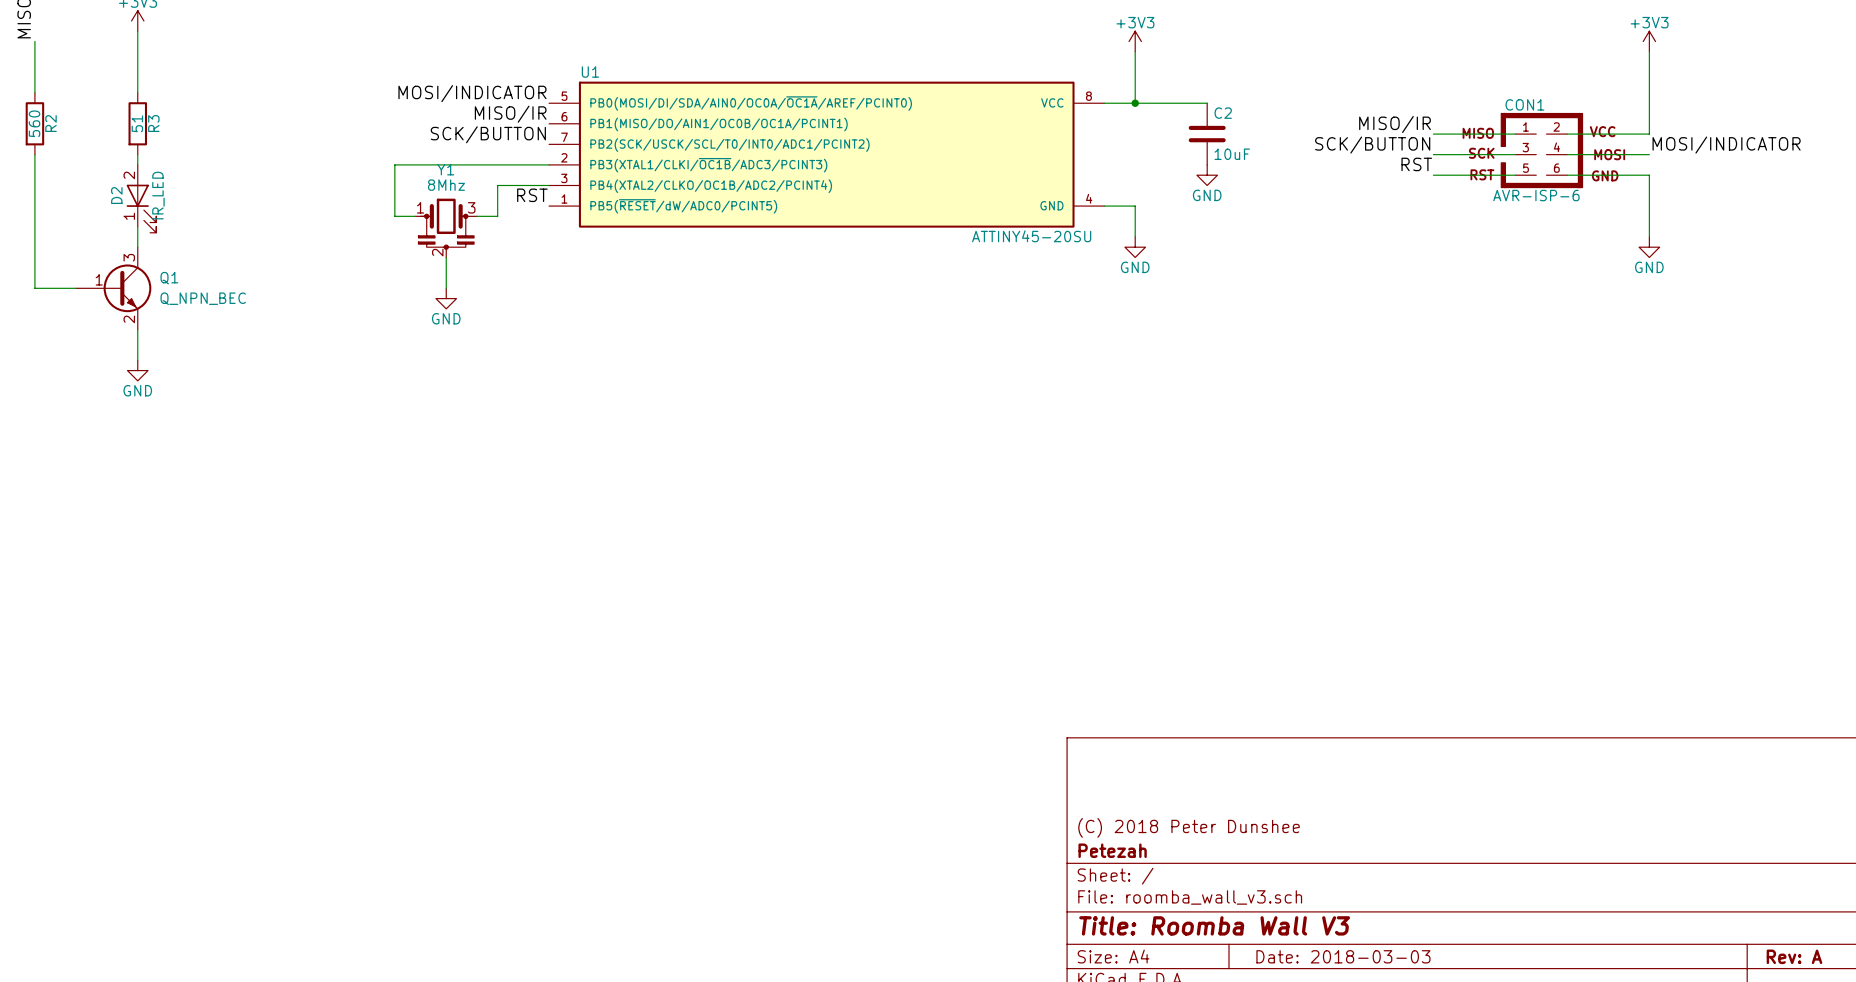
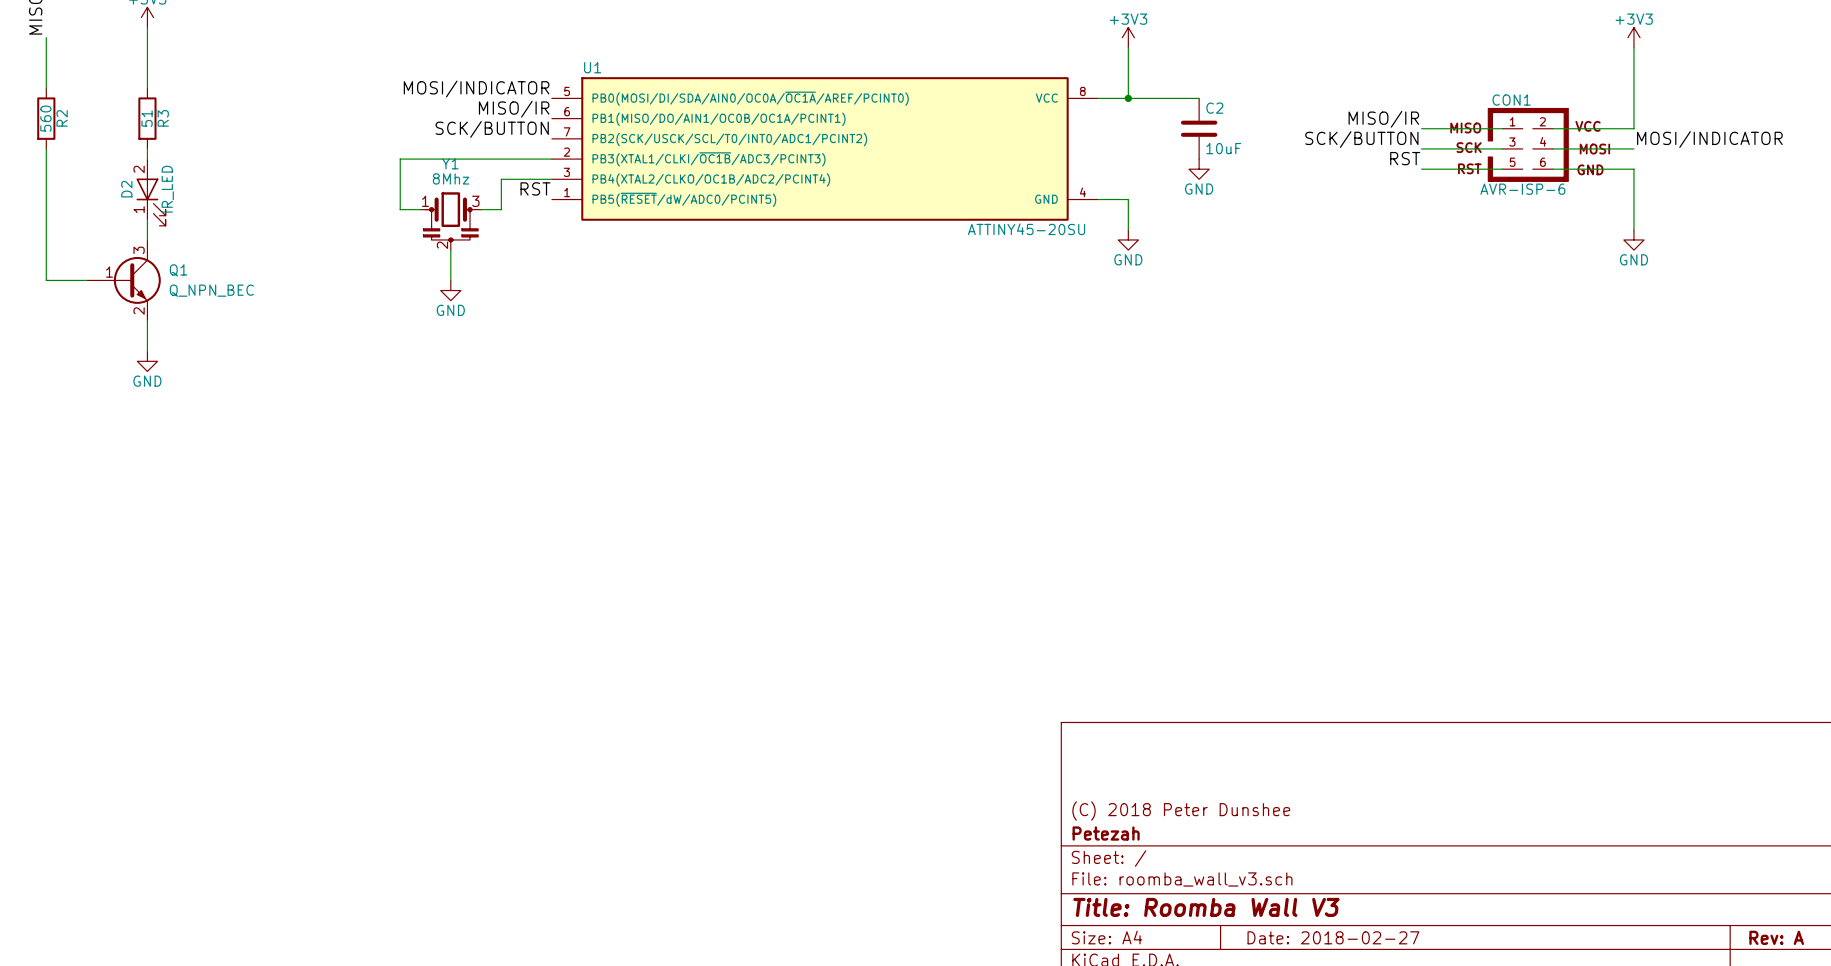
title block: Date: 2018-03-03 (1343, 956) -> Date: 2018-02-27 (1333, 937)

